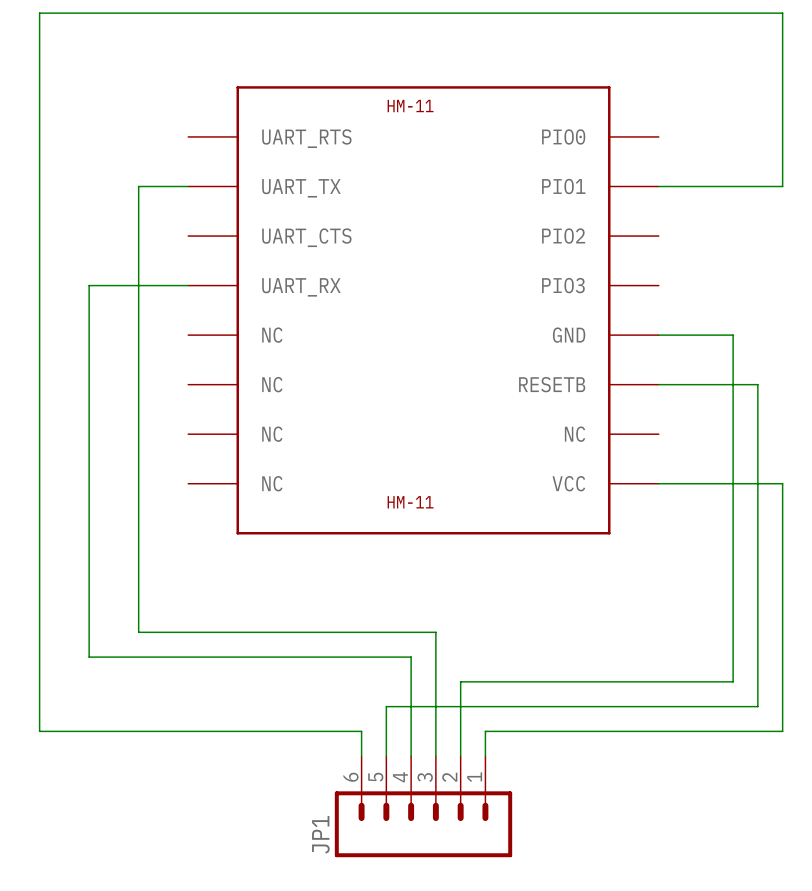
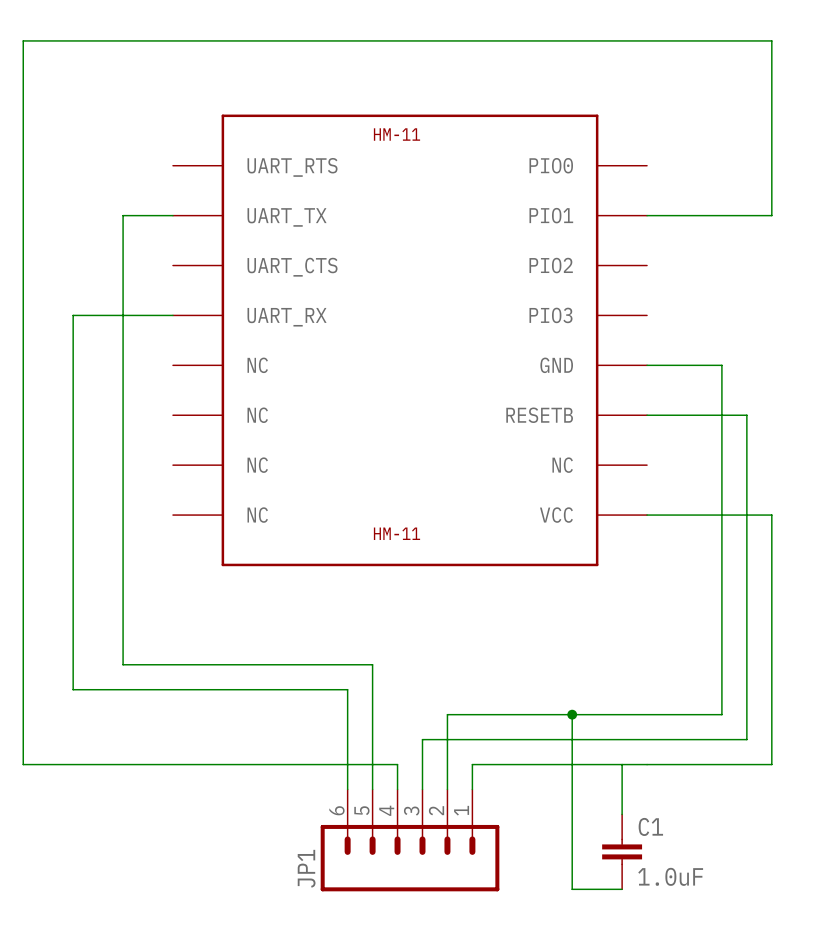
wire: (386, 632) (435, 632) (435, 706) (386, 706) -> (372, 664) (372, 739)
wire: (361, 657) (411, 657) (411, 731) -> (347, 689) (347, 764) (397, 764)
wire: none -> (572, 714) (572, 889) (622, 889)
junction: none -> (572, 714)
wire: none -> (622, 764) (622, 814)
C1: none -> 1.0uF (622, 851)

